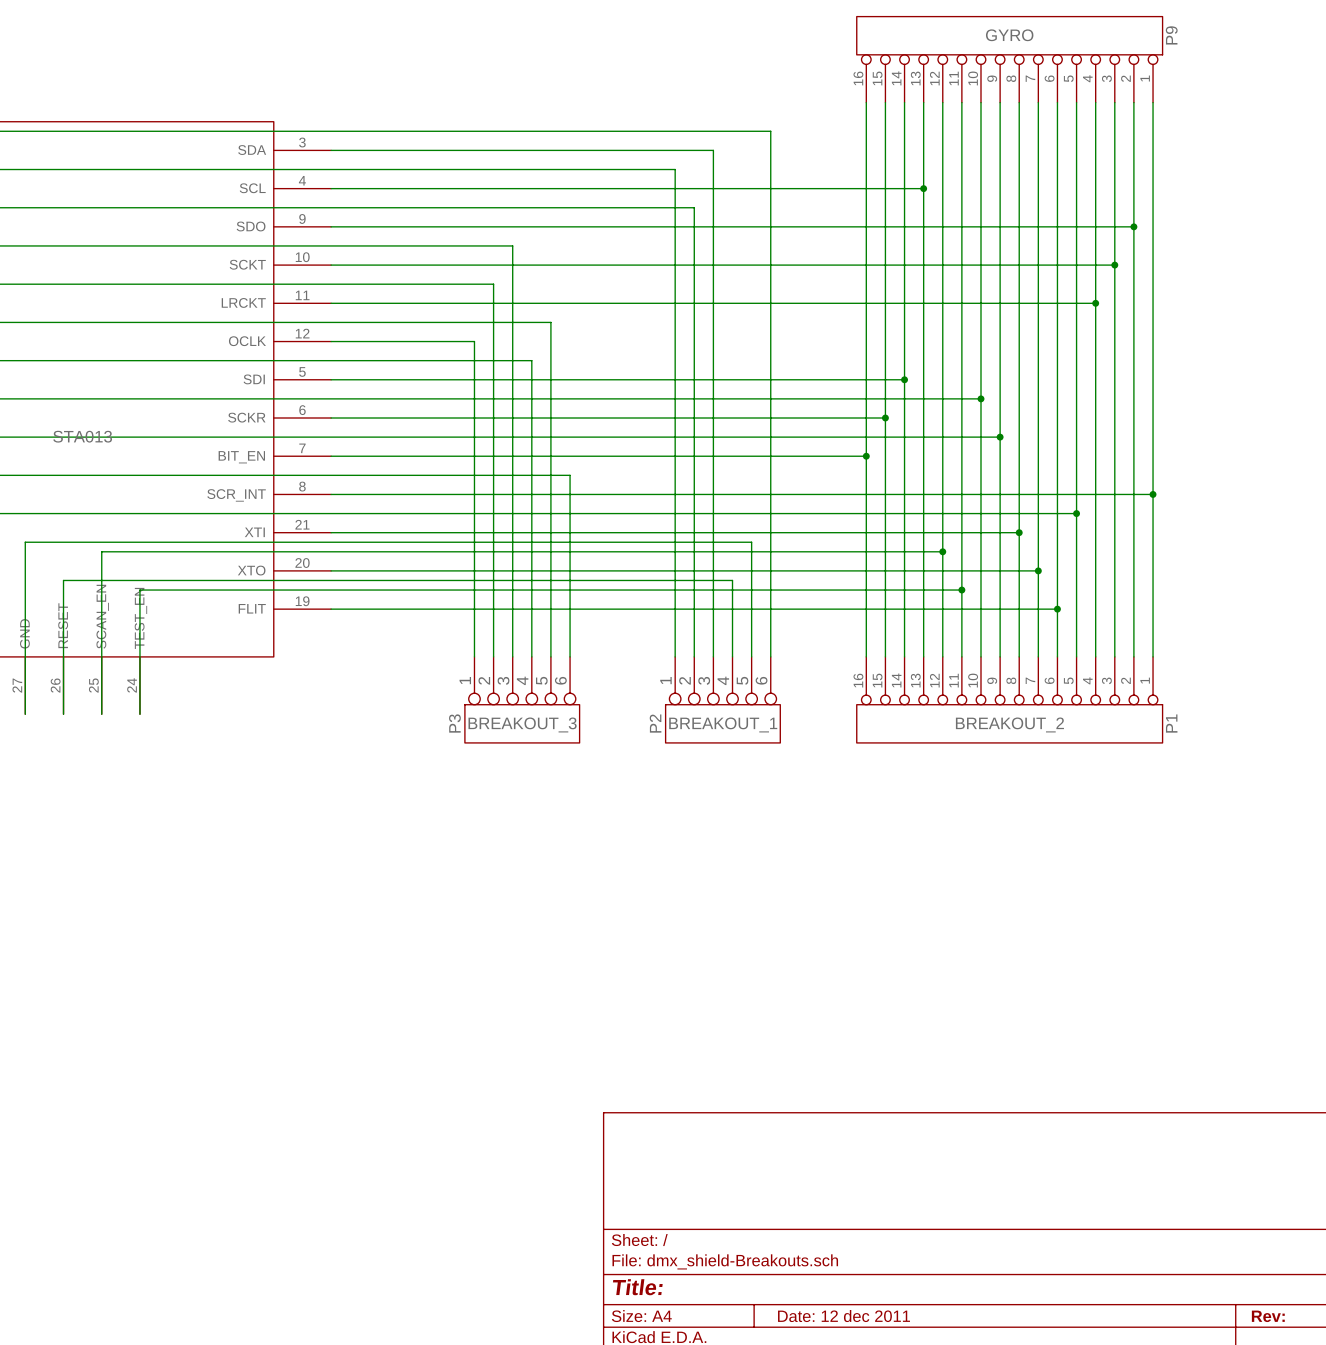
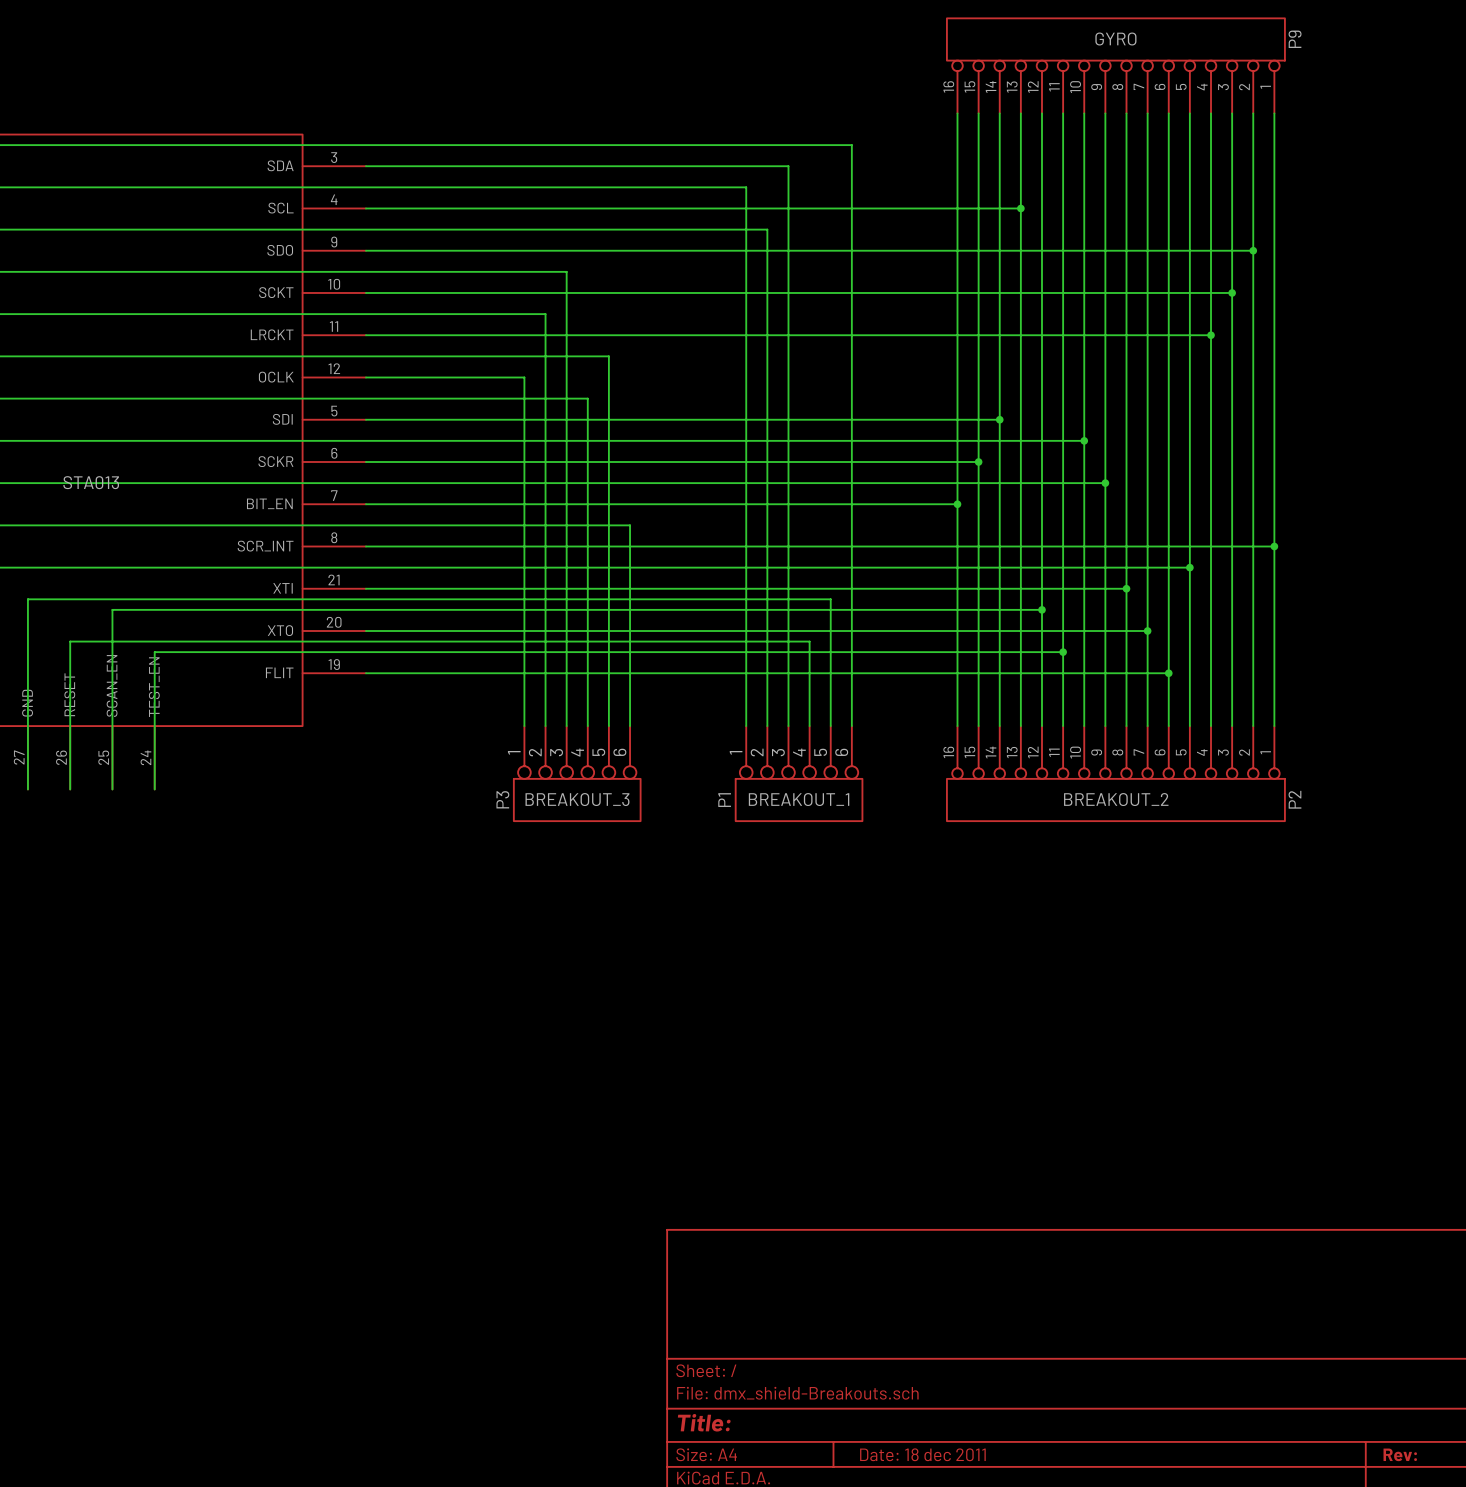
P2 name: P2 (655, 723) -> P1 (724, 800)
P1 name: P1 (1171, 723) -> P2 (1294, 799)
title block: Date: 12 dec 2011 (844, 1316) -> Date: 18 dec 2011 (922, 1454)

